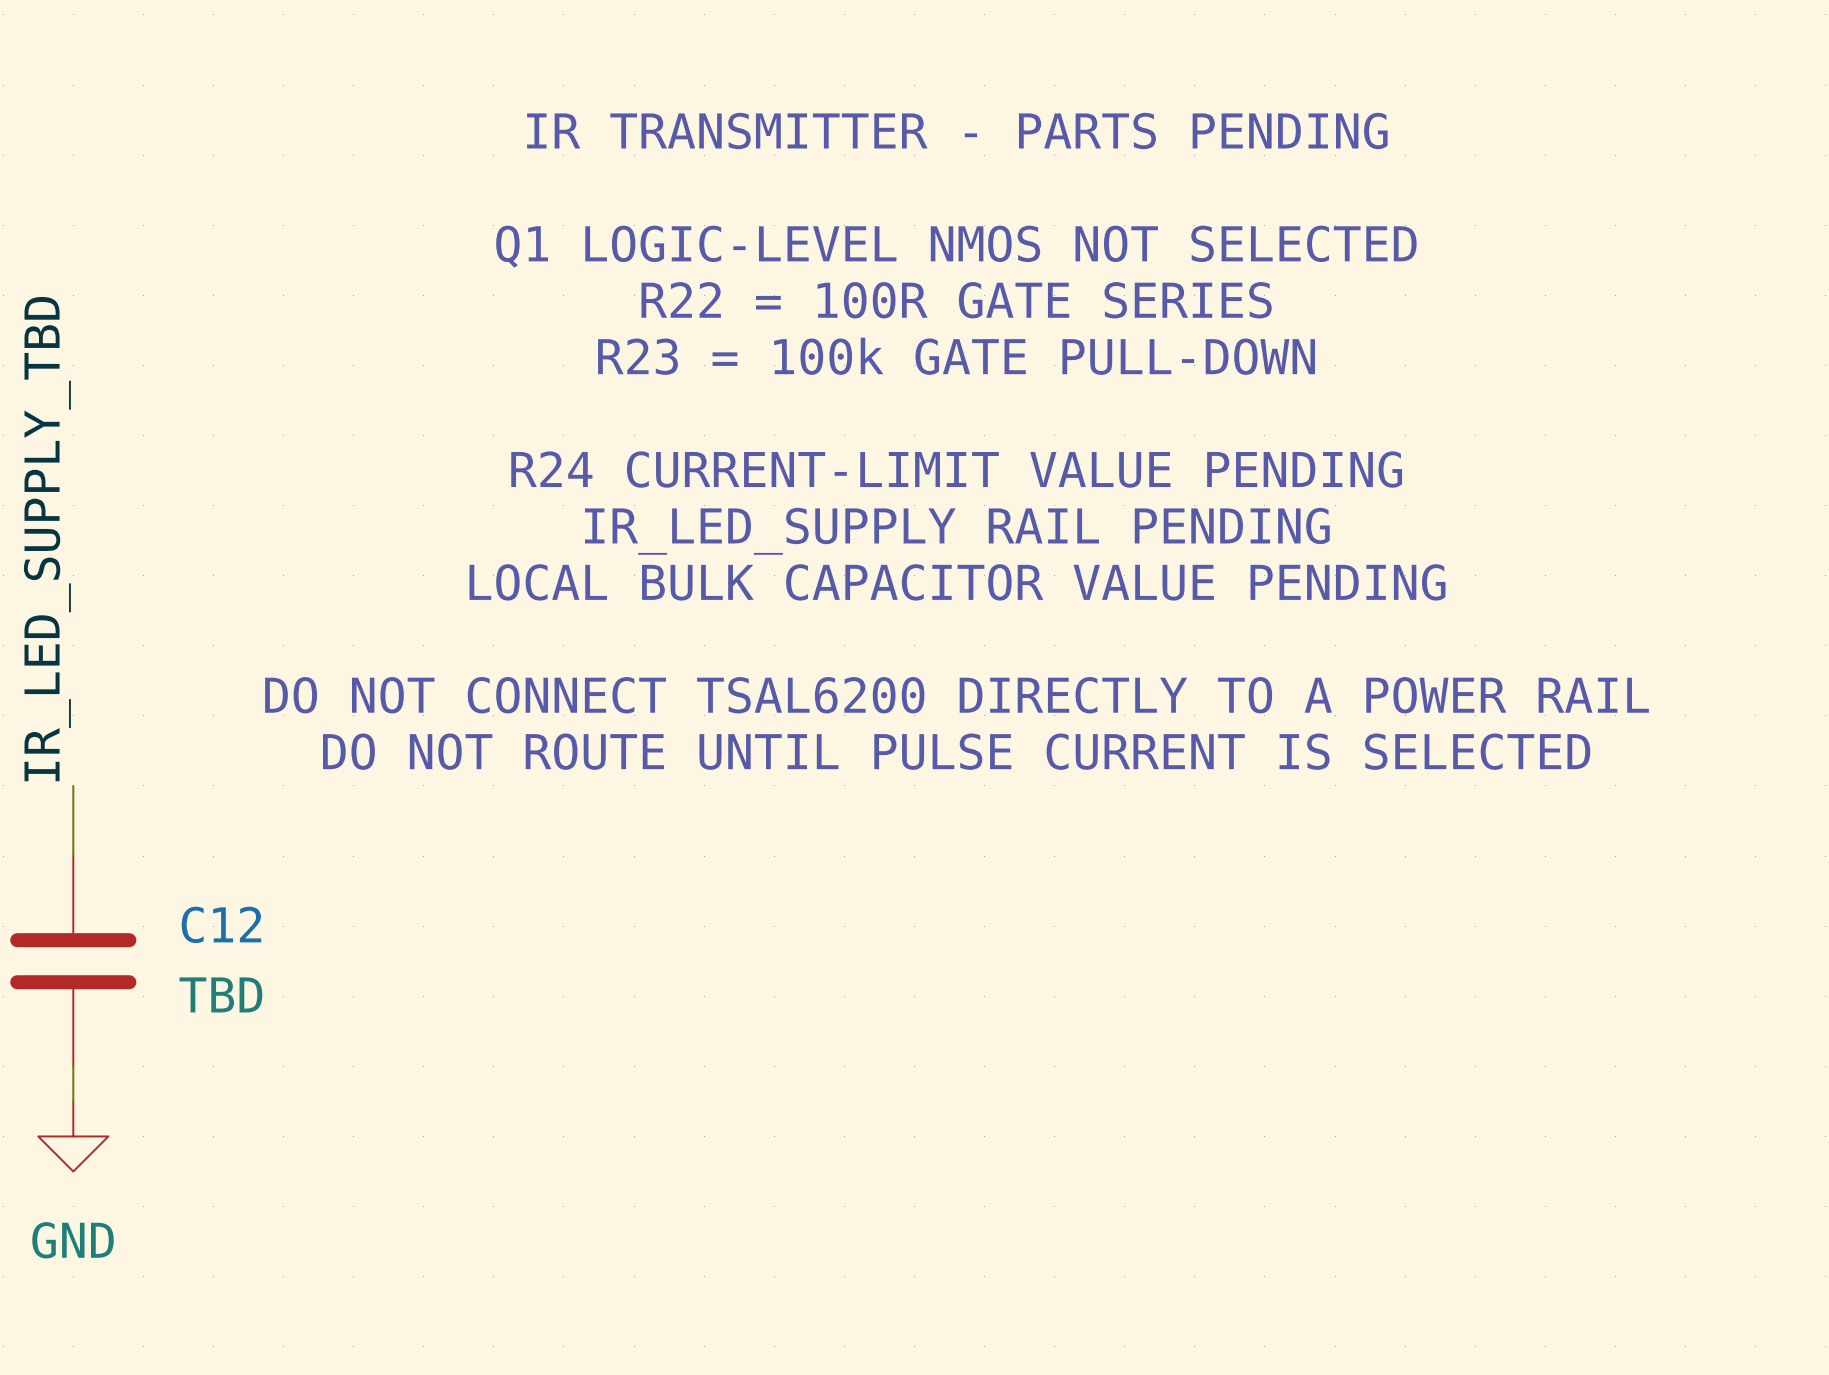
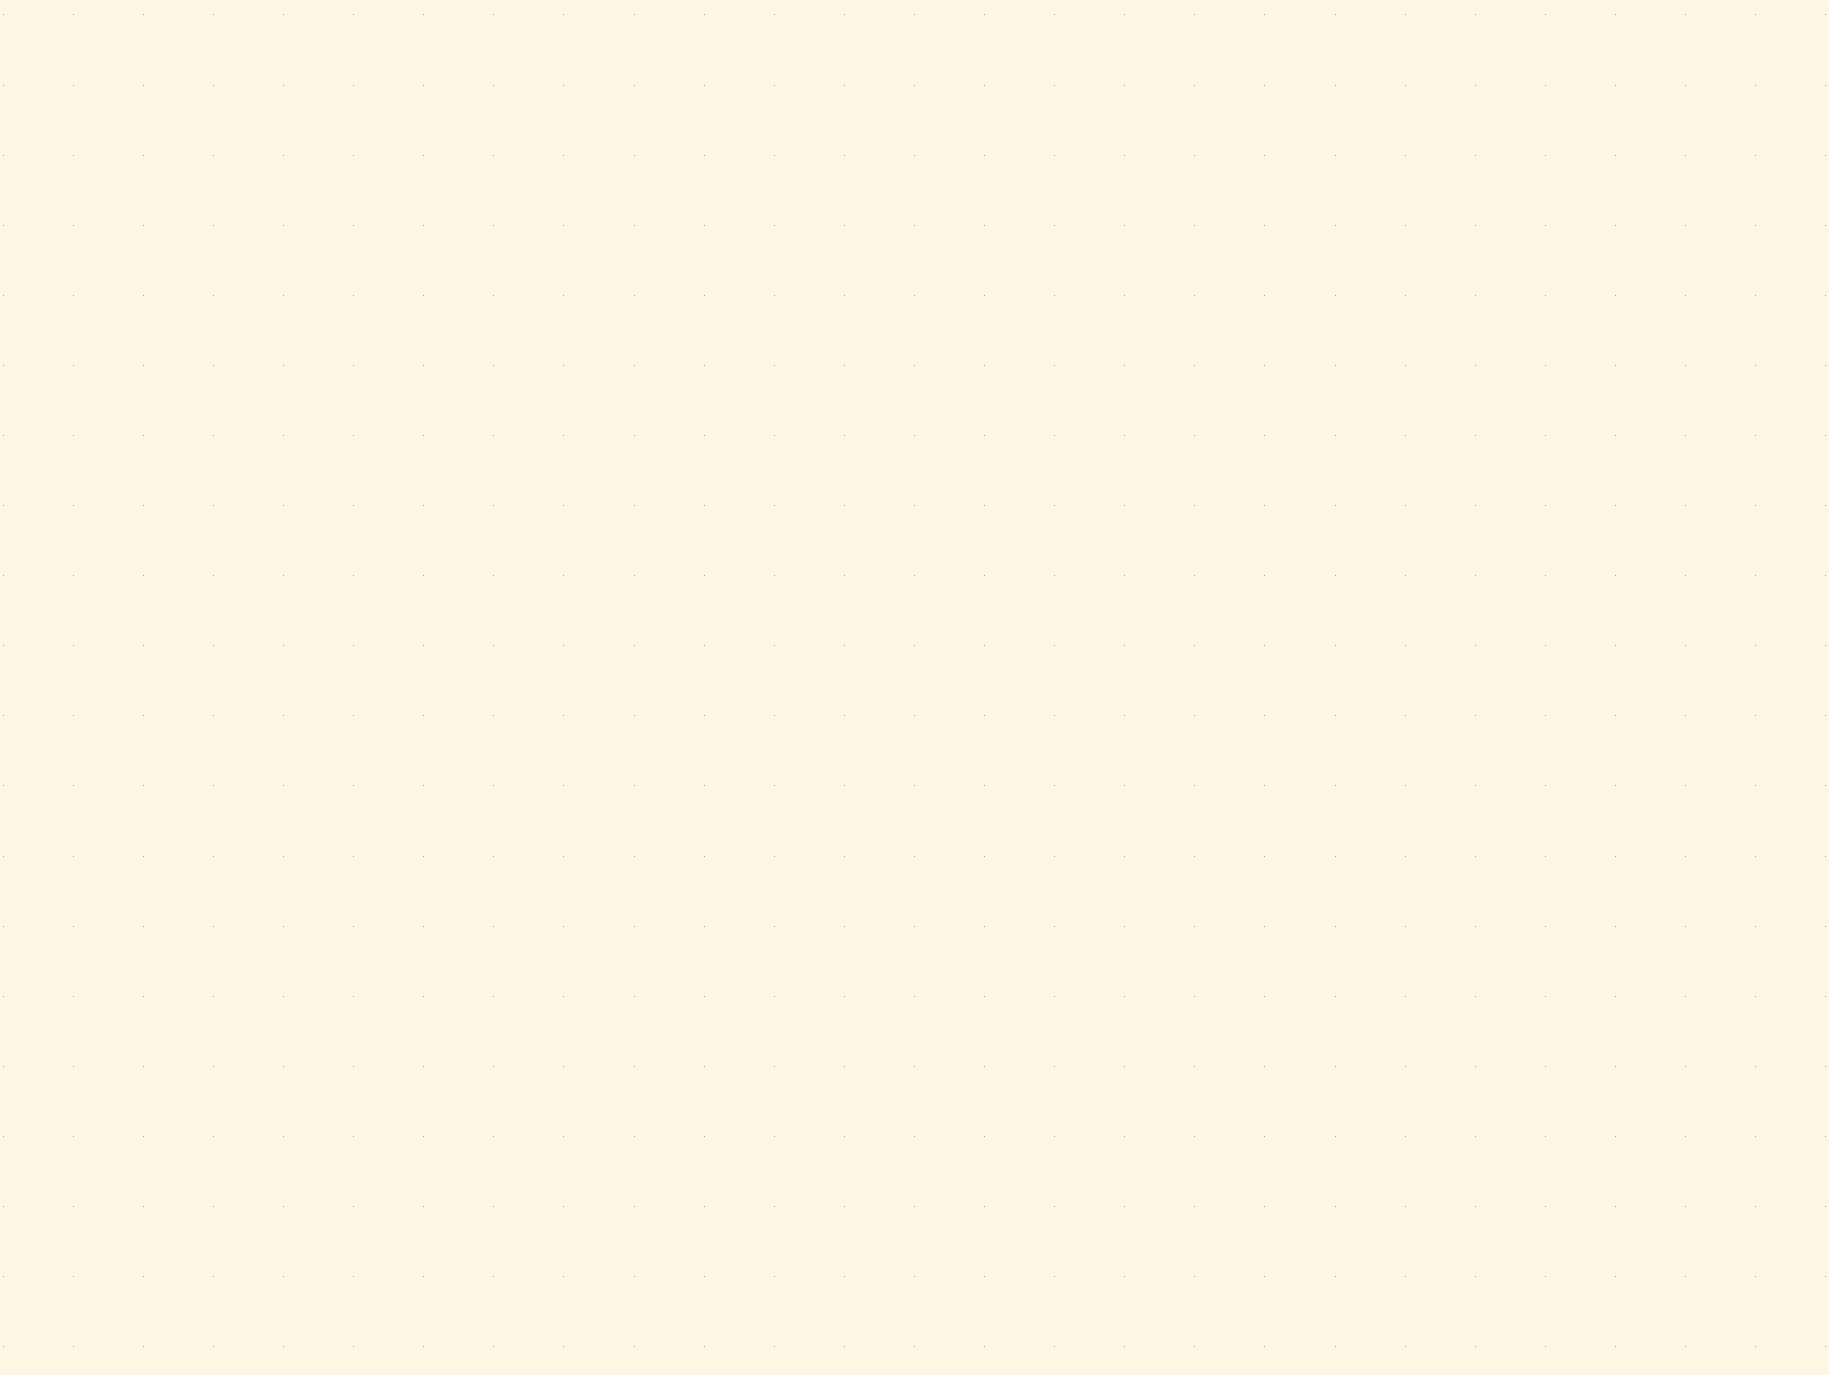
text: IR TRANSMITTER - PARTS PENDING (957, 130) -> none
text: Q1 LOGIC-LEVEL NMOS NOT SELECTED (956, 246) -> none
text: R22 = 100R GATE SERIES (956, 300) -> none
text: R23 = 100k GATE PULL-DOWN (956, 356) -> none
text: R24 CURRENT-LIMIT VALUE PENDING (956, 469) -> none
text: IR_LED_SUPPLY RAIL PENDING (957, 531) -> none
label: IR_LED_SUPPLY_TBD (47, 539) -> none
text: LOCAL BULK CAPACITOR VALUE PENDING (957, 582) -> none
text: DO NOT CONNECT TSAL6200 DIRECTLY TO A POWER RAIL (957, 695) -> none
text: DO NOT ROUTE UNTIL PULSE CURRENT IS SELECTED (956, 751) -> none
wire: (73, 785) (73, 856) -> none
C12: TBD (73, 961) -> none
wire: (73, 1066) (73, 1101) -> none
power symbol: GND (73, 1136) -> none

